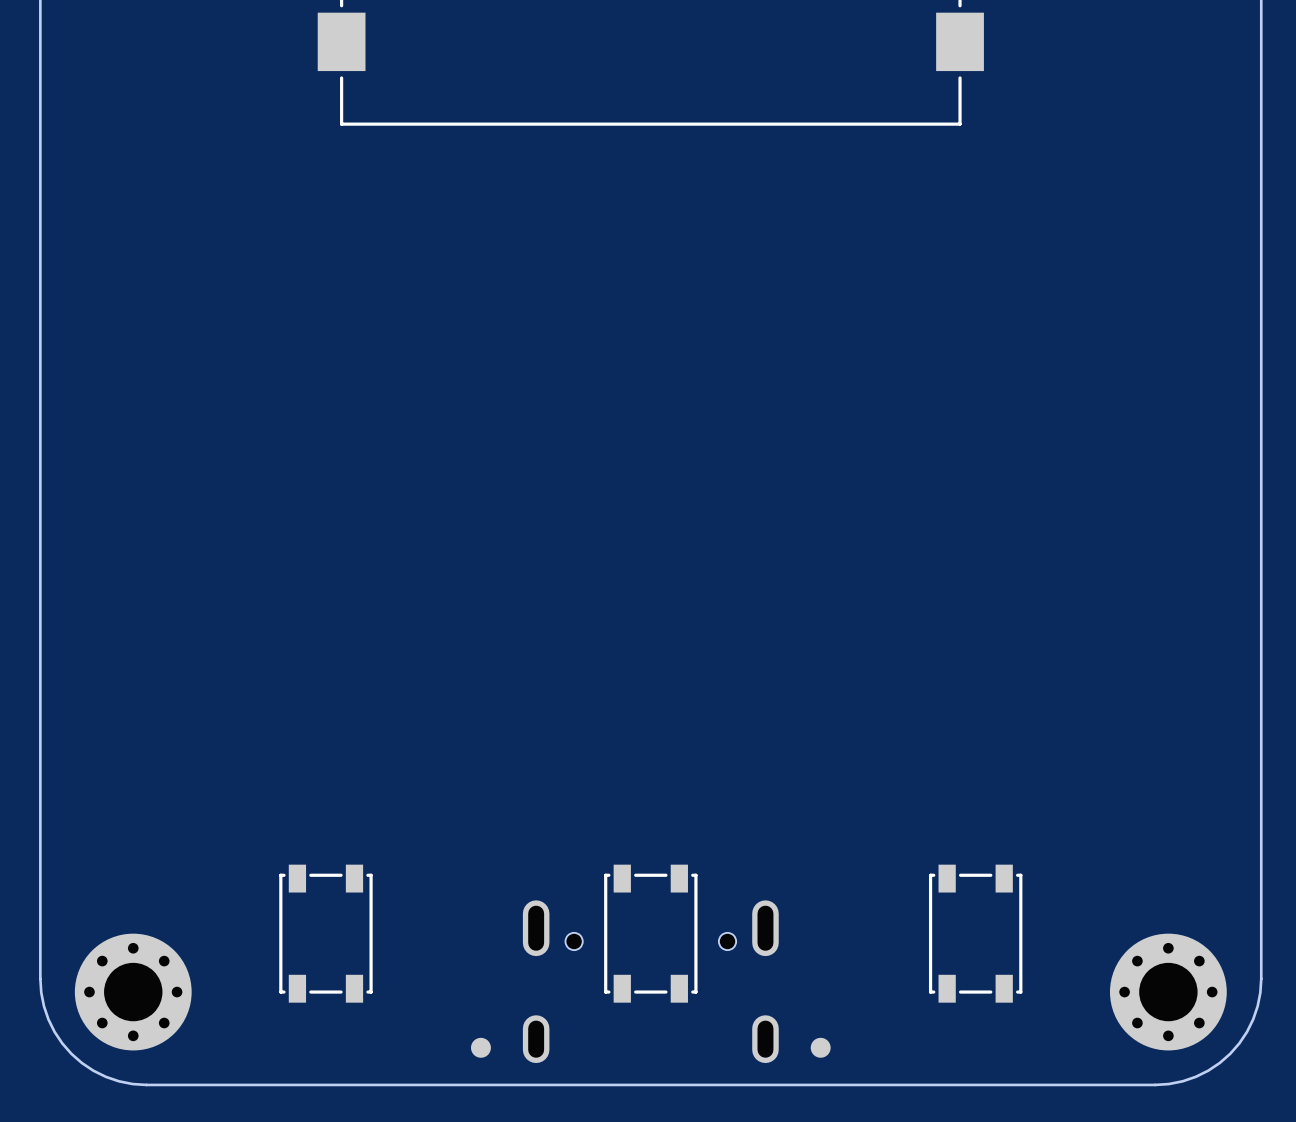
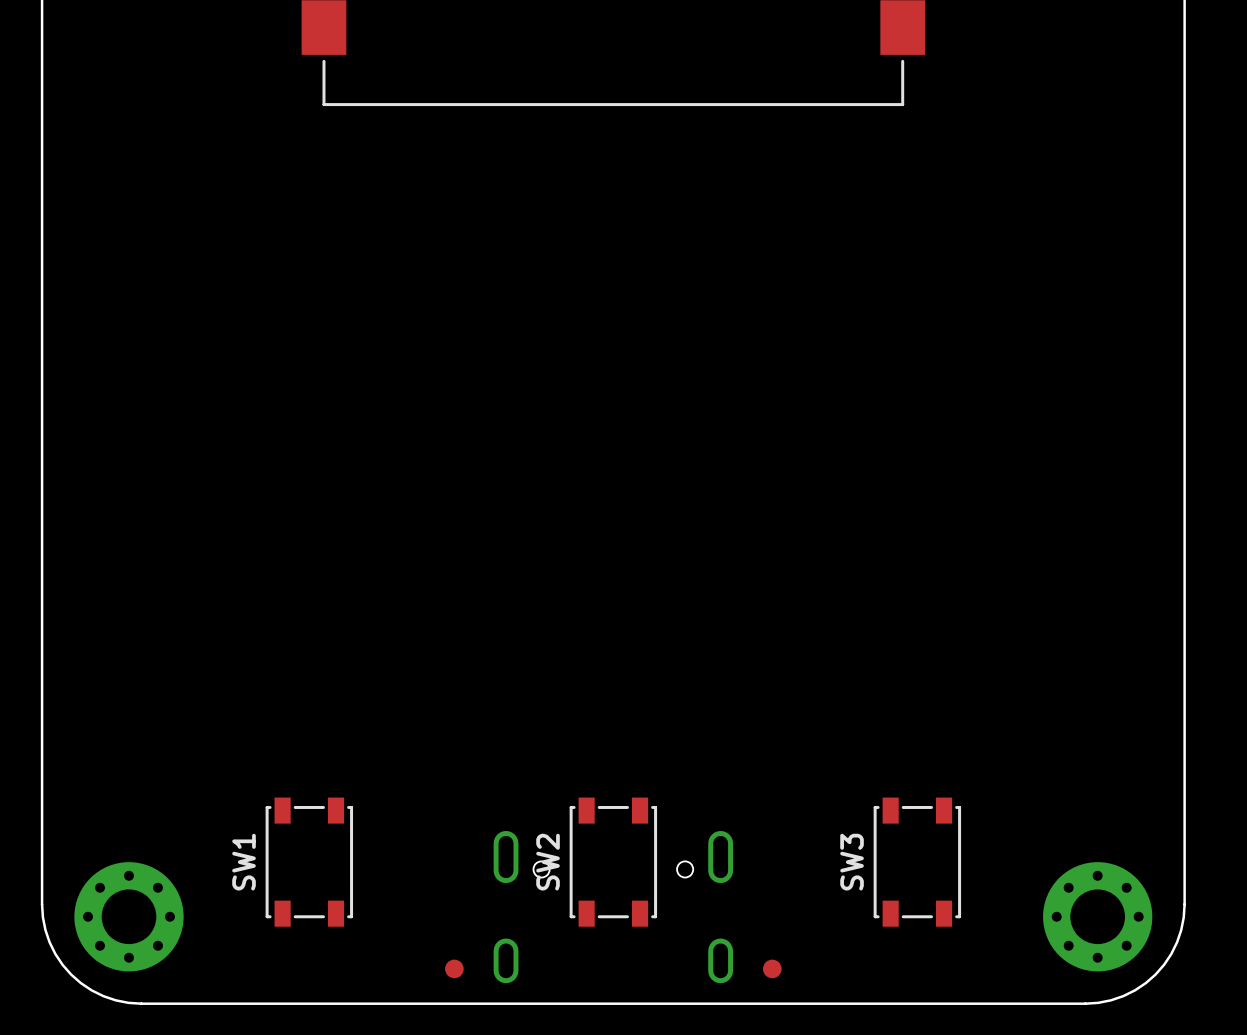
SW3 name: none -> SW3 (852, 862)
SW1 name: none -> SW1 (244, 862)
SW2 name: none -> SW2 (548, 862)

